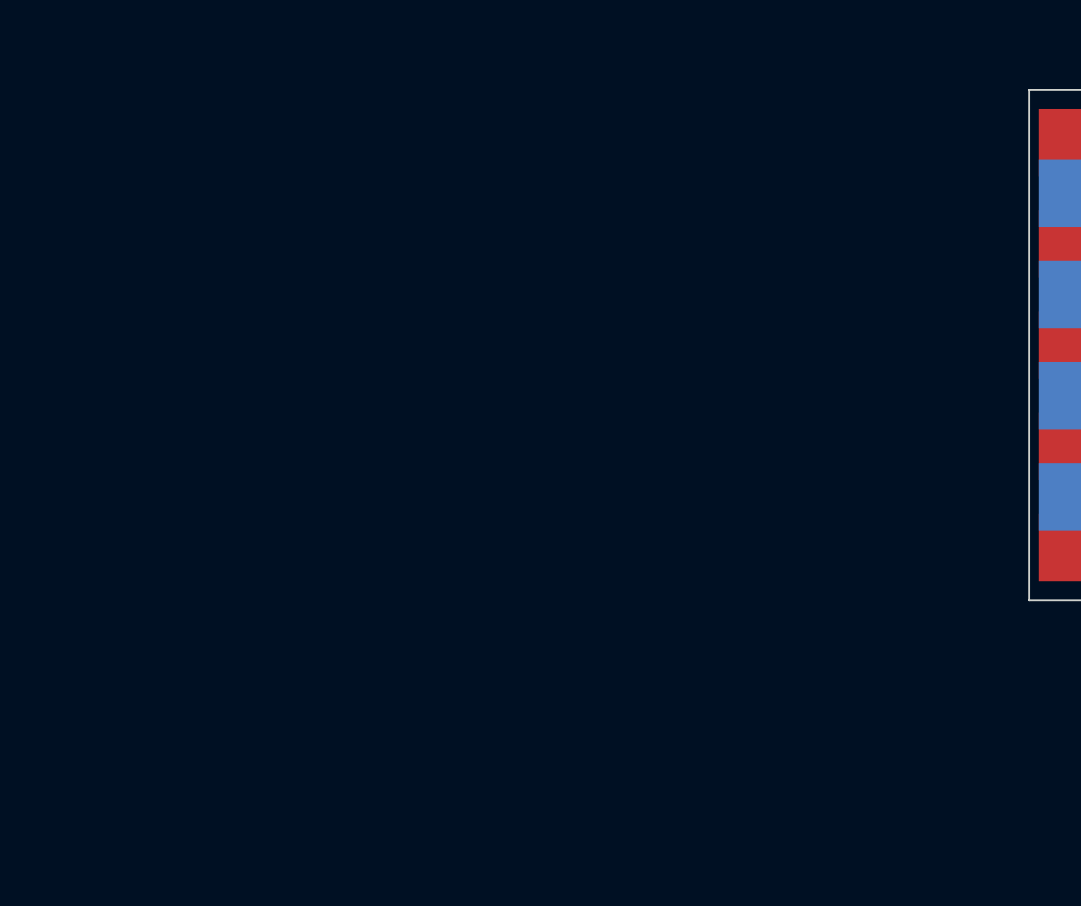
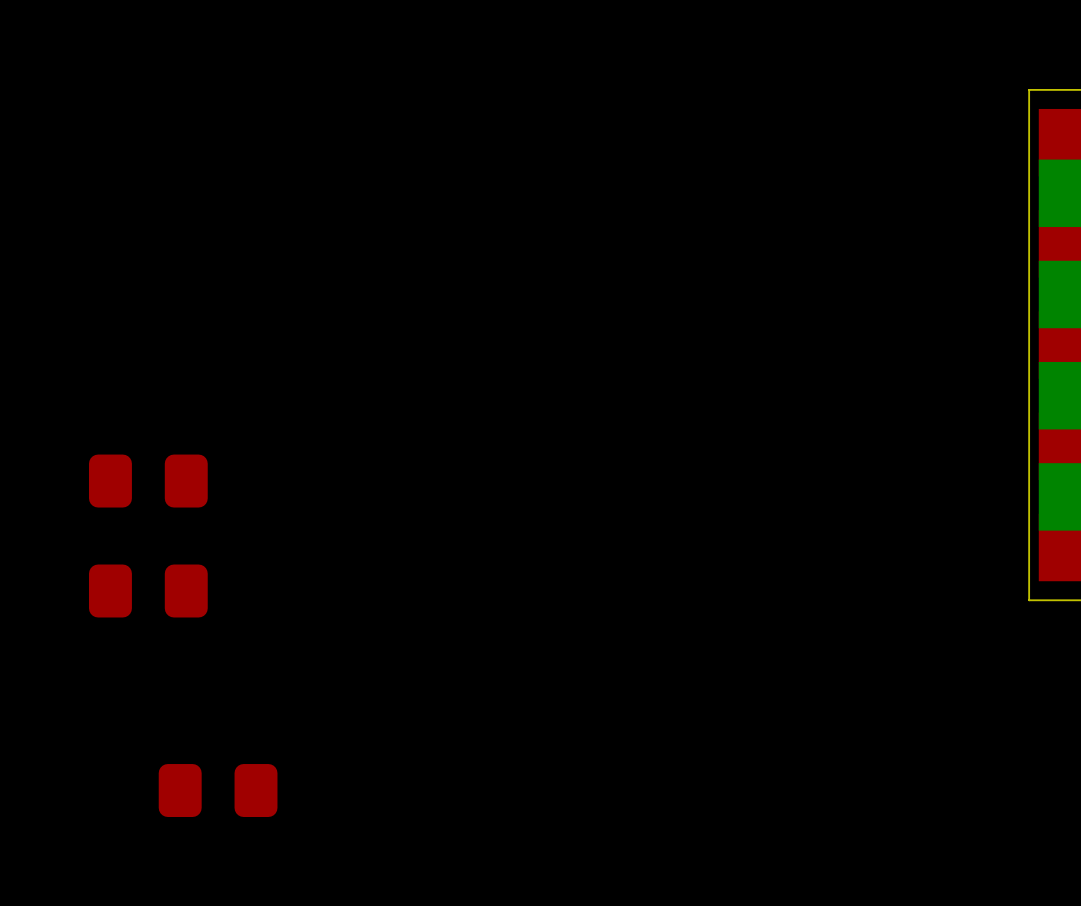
part: none -> (148, 481)
part: none -> (148, 591)
part: none -> (218, 790)

